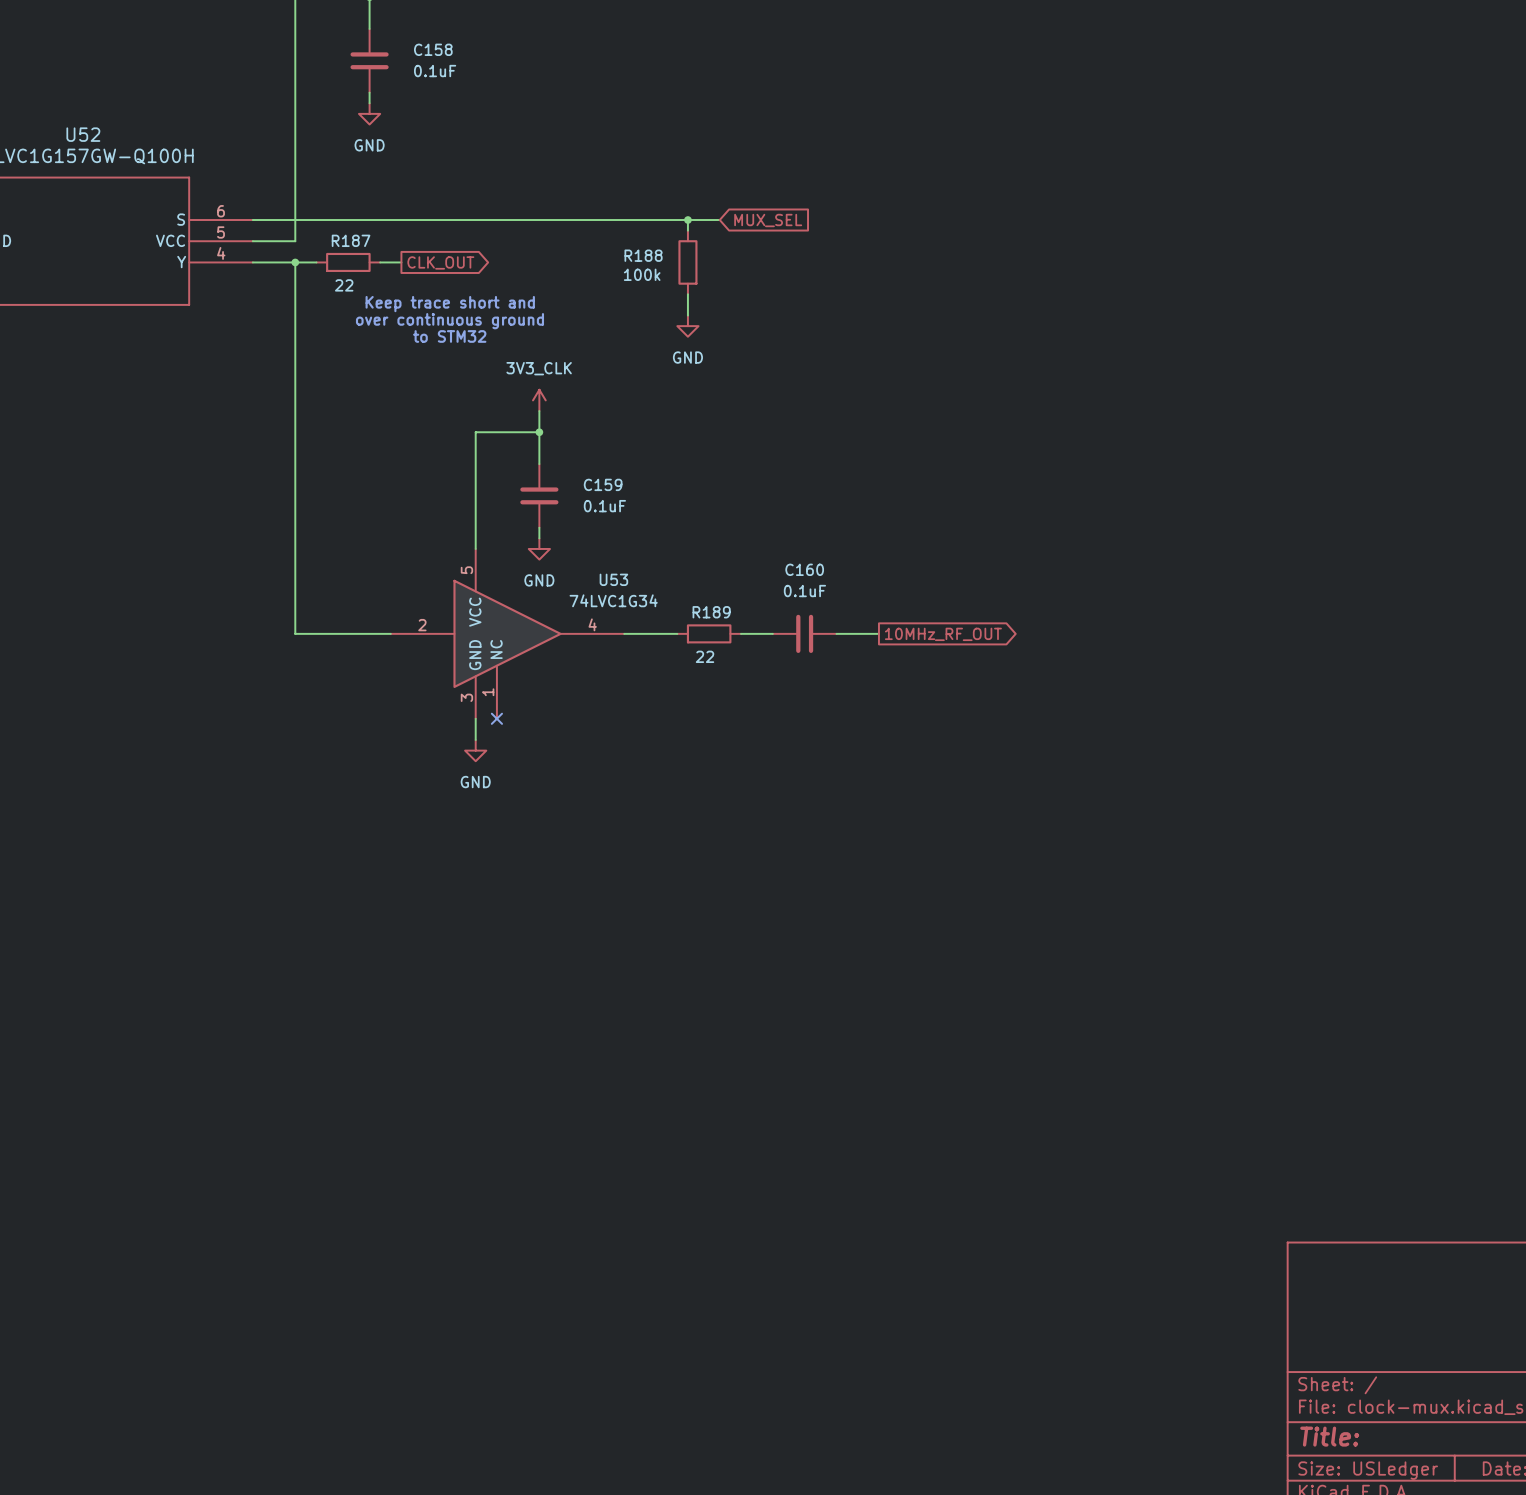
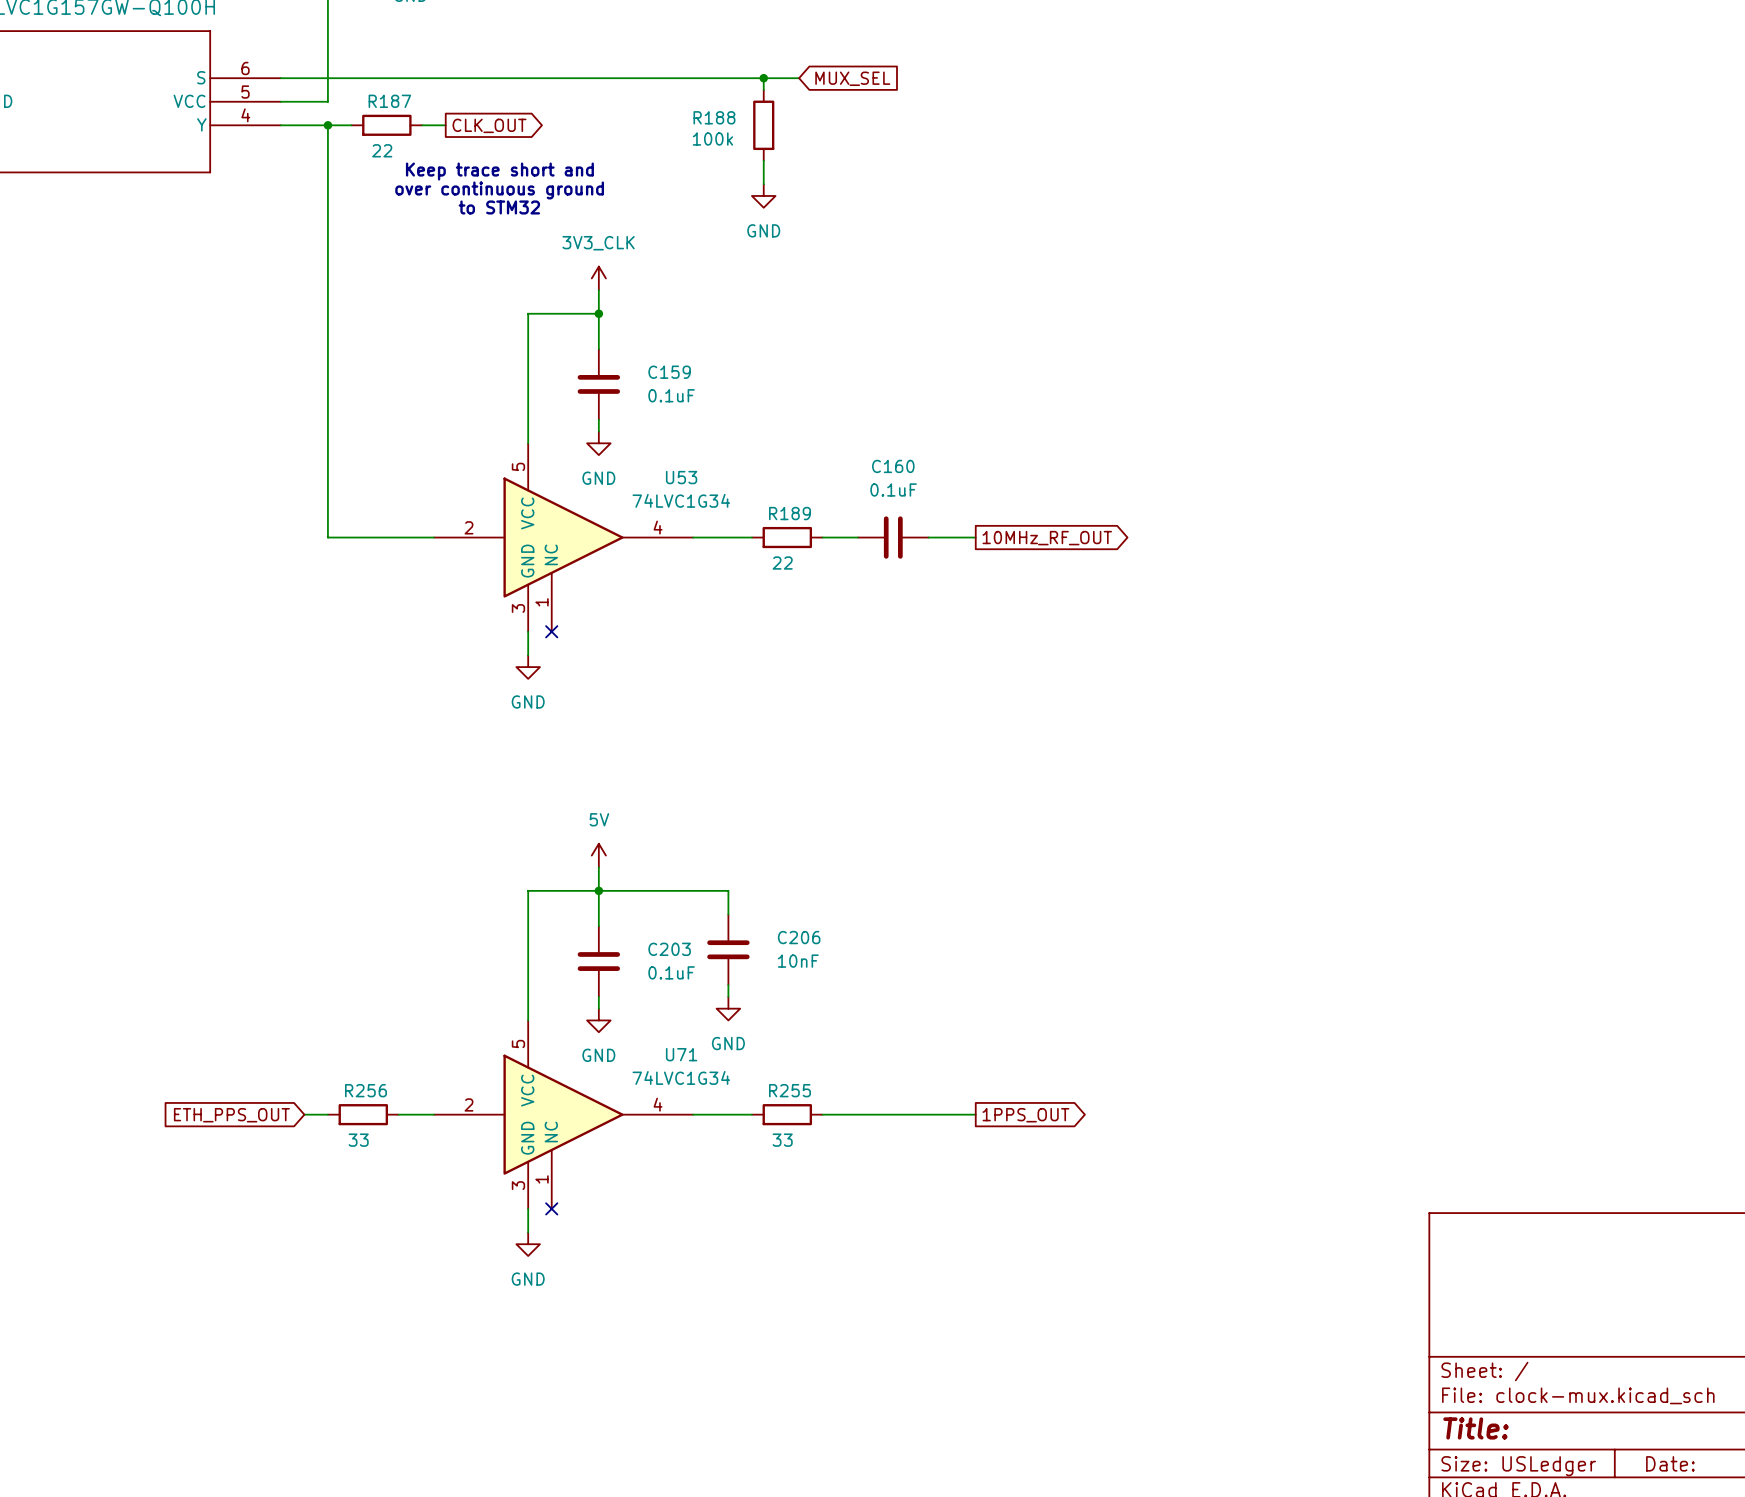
power symbol: none -> 5V (598, 855)
wire: none -> (598, 867) (598, 926)
junction: none -> (598, 890)
wire: none -> (728, 914) (728, 890) (528, 890) (528, 1020)
C206: none -> 10nF (728, 949)
C203: none -> 0.1uF (598, 961)
wire: none -> (728, 985) (728, 996)
wire: none -> (598, 996) (598, 1008)
power symbol: none -> GND (728, 1008)
power symbol: none -> GND (598, 1020)
wire: none -> (304, 1114) (327, 1114)
R256: none -> 33 (363, 1114)
wire: none -> (398, 1114) (433, 1114)
U71: none -> 74LVC1G34 (563, 1114)
wire: none -> (693, 1114) (751, 1114)
R255: none -> 33 (787, 1114)
wire: none -> (822, 1114) (975, 1114)
global label: none -> ETH_PPS_OUT (231, 1115)
global label: none -> 1PPS_OUT (1025, 1115)
wire: none -> (528, 1208) (528, 1232)
no-connect mark: none -> (551, 1208)
power symbol: none -> GND (528, 1244)

